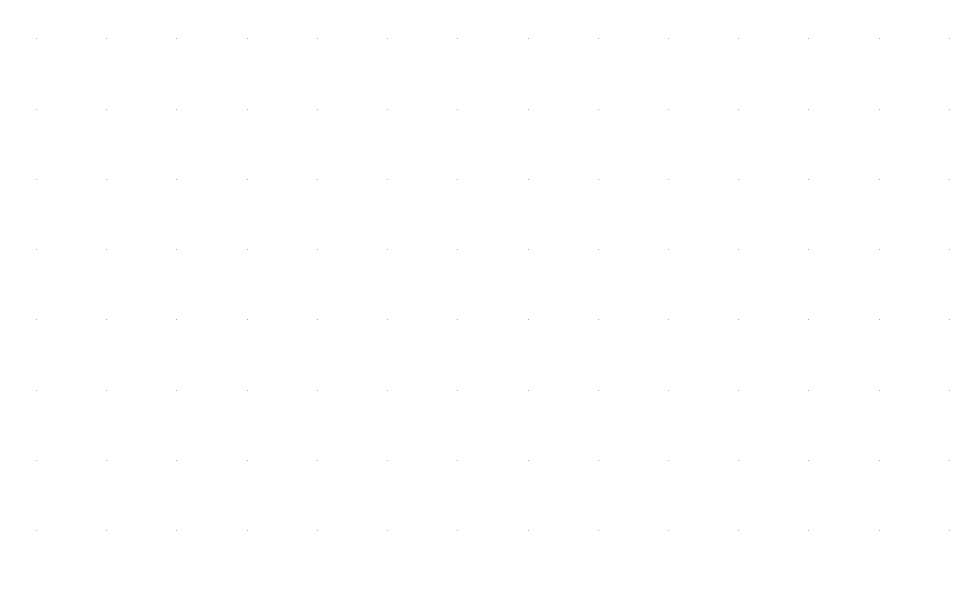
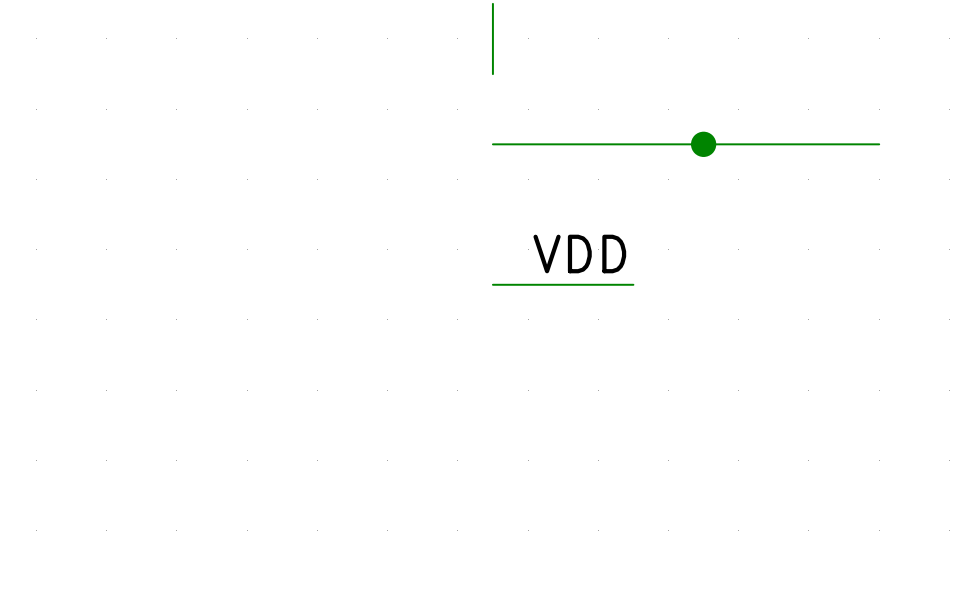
wire: none -> (492, 3) (492, 74)
wire: none -> (492, 144) (879, 144)
junction: none -> (703, 144)
label: none -> VDD (579, 254)
wire: none -> (492, 284) (633, 284)

